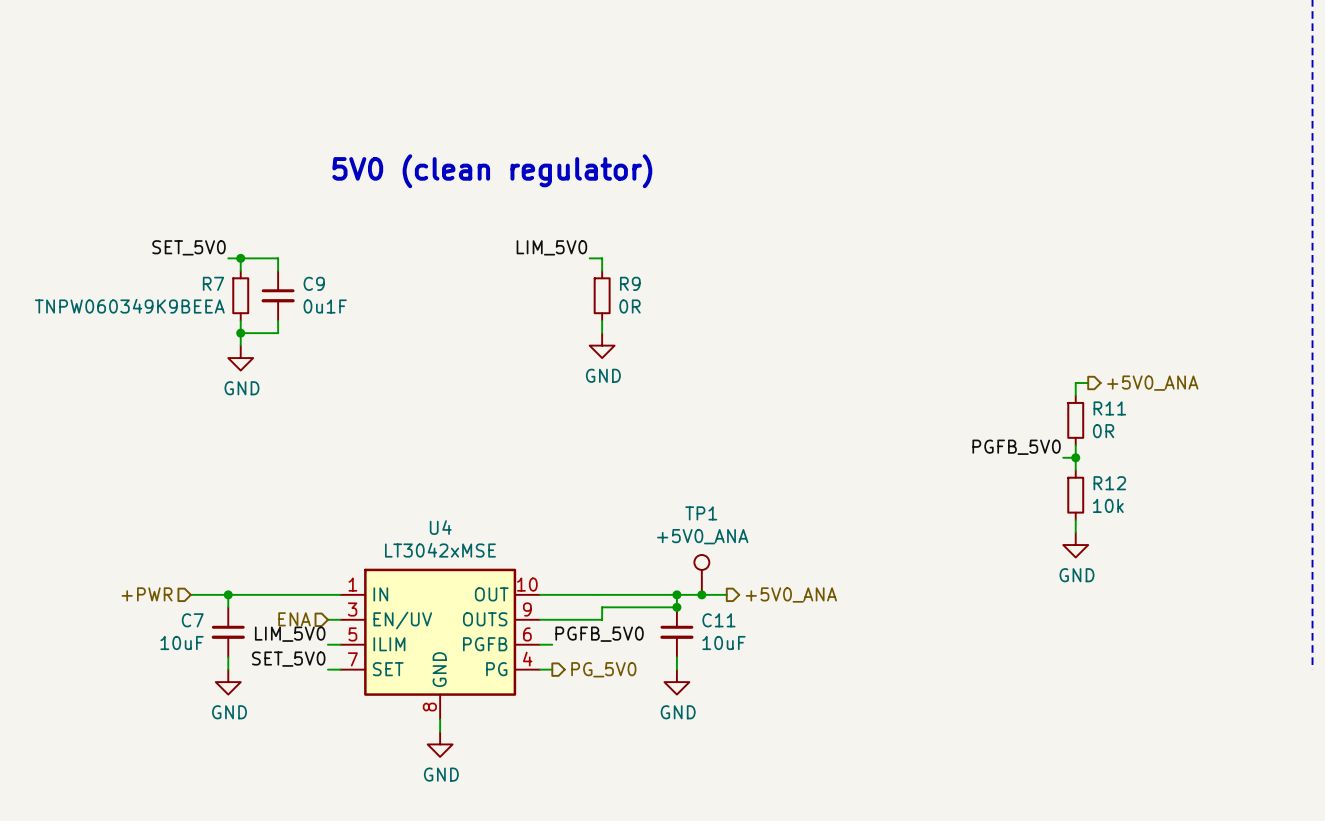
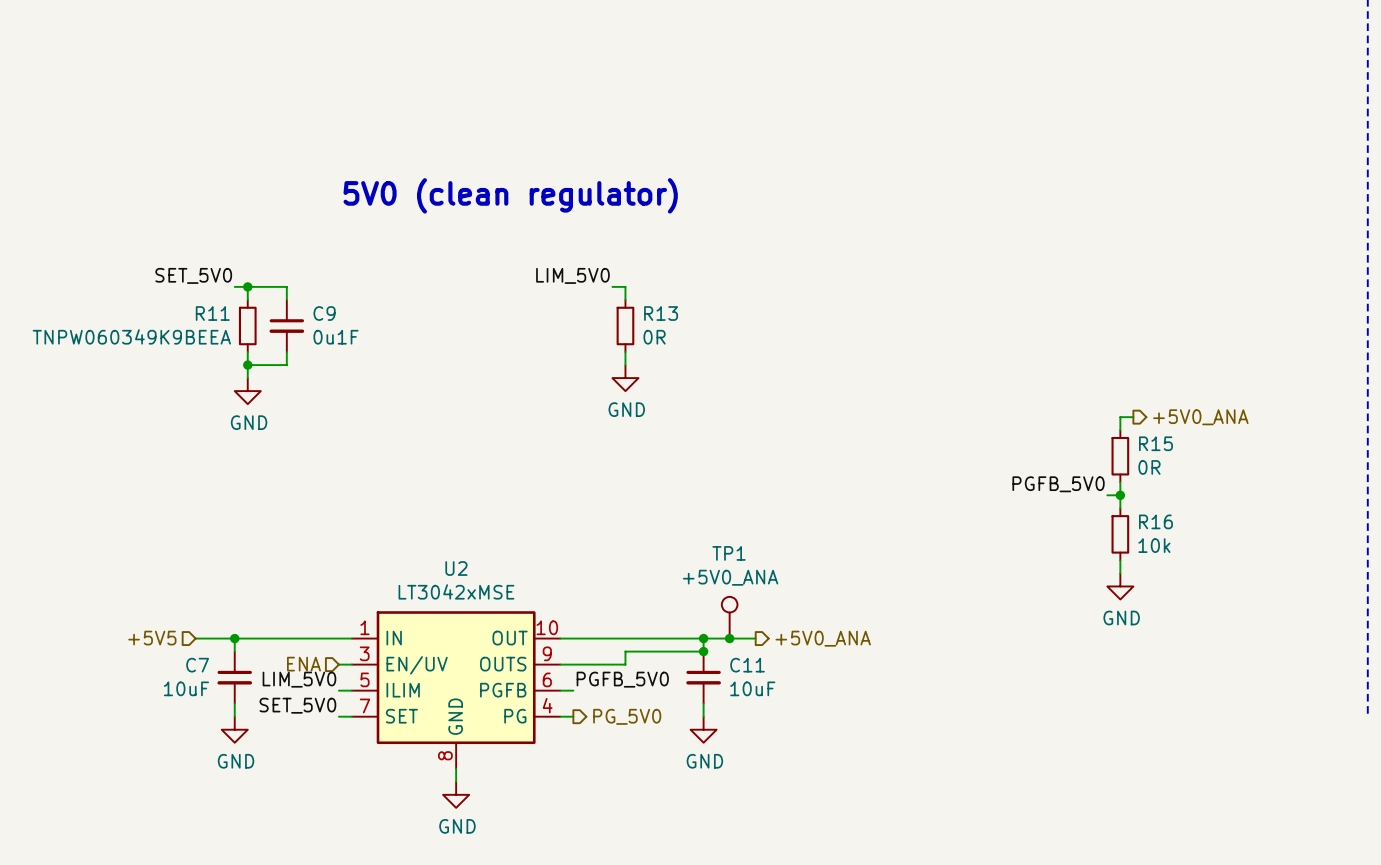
R7 name: R7 (213, 283) -> R11 (212, 313)
R9 name: R9 (630, 283) -> R13 (661, 313)
R11 name: R11 (1109, 408) -> R15 (1155, 443)
R12 name: R12 (1109, 483) -> R16 (1155, 521)
U4 name: U4 (440, 527) -> U2 (456, 568)
hierarchical label: +PWR (147, 594) -> +5V5 (152, 638)

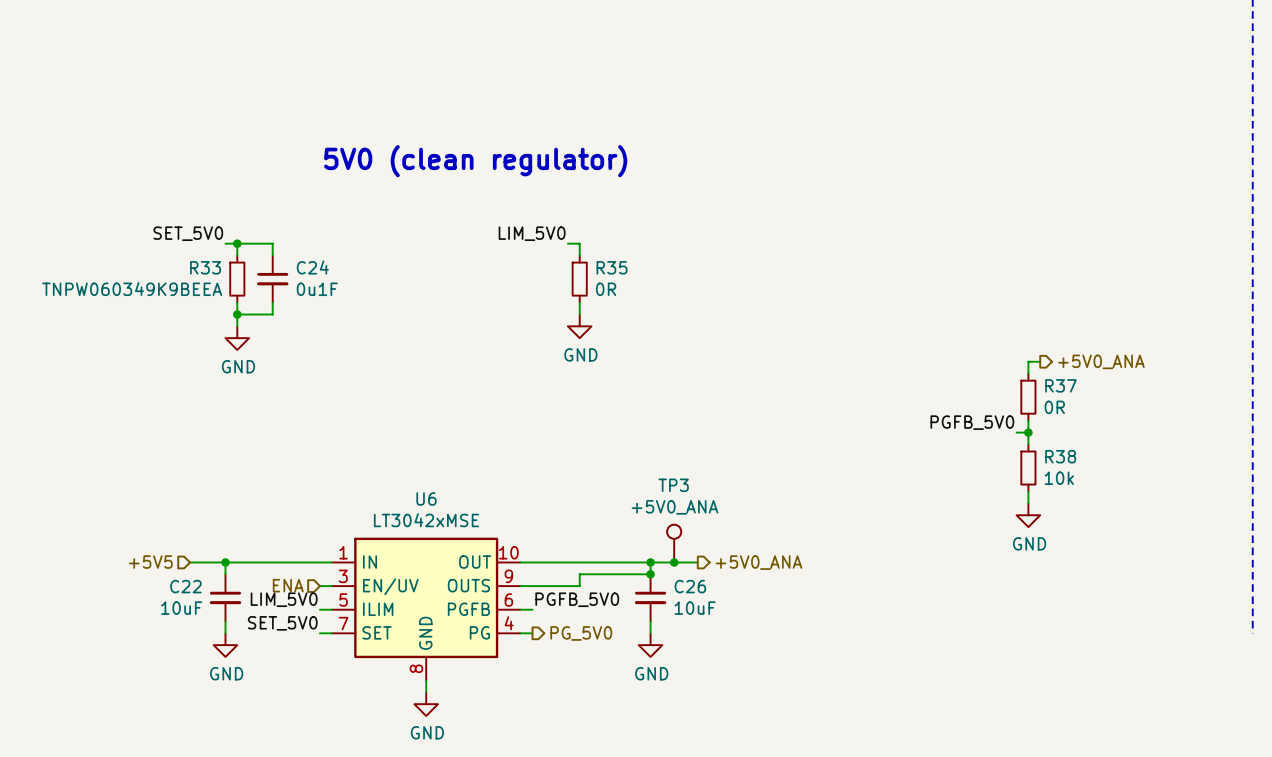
R11 name: R11 (212, 313) -> R33 (205, 267)
C9 name: C9 (324, 313) -> C24 (312, 267)
R13 name: R13 (661, 313) -> R35 (612, 267)
R15 name: R15 (1155, 443) -> R37 (1060, 385)
R16 name: R16 (1155, 521) -> R38 (1060, 456)
TP1 name: TP1 (729, 553) -> TP3 (673, 485)
U2 name: U2 (456, 568) -> U6 (426, 498)
C7 name: C7 (197, 665) -> C22 (185, 586)
C11 name: C11 (747, 665) -> C26 (690, 586)

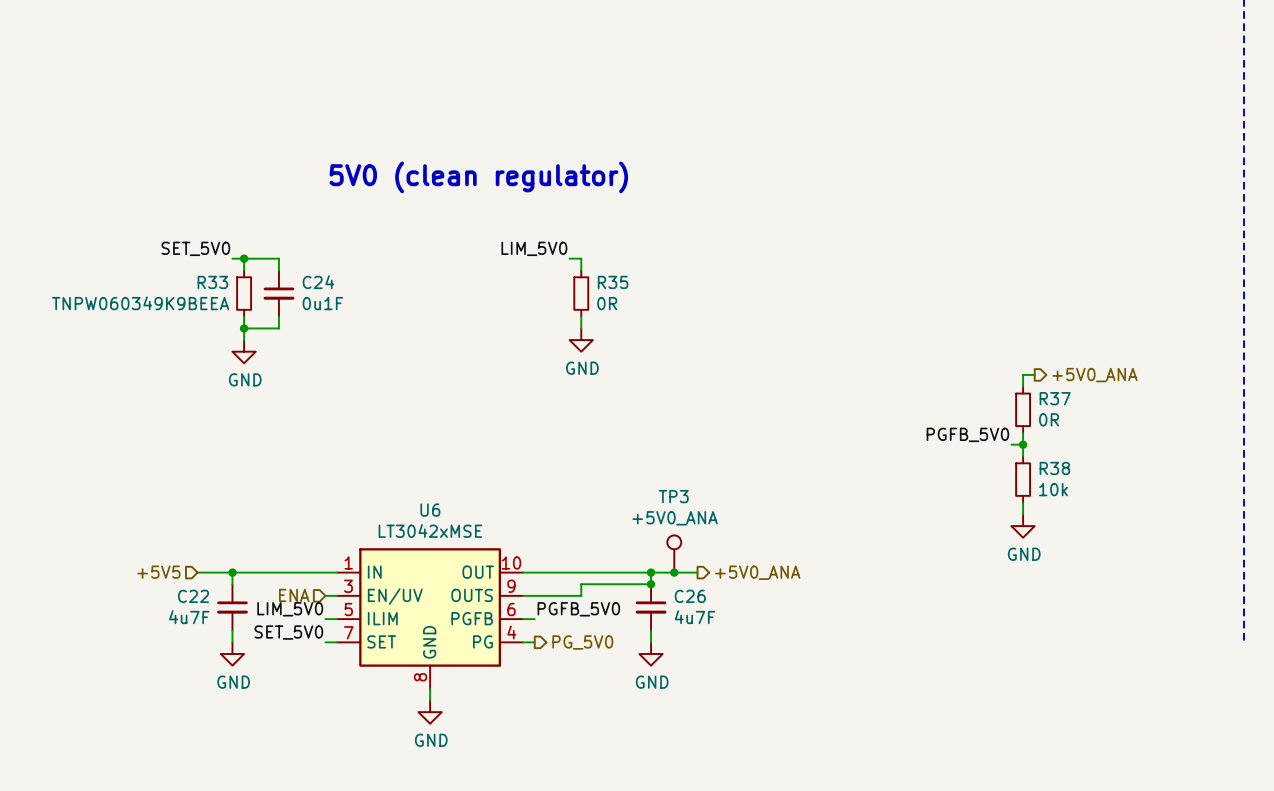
C22 value: 10uF (181, 608) -> 4u7F (189, 617)
C26 value: 10uF (695, 608) -> 4u7F (694, 617)

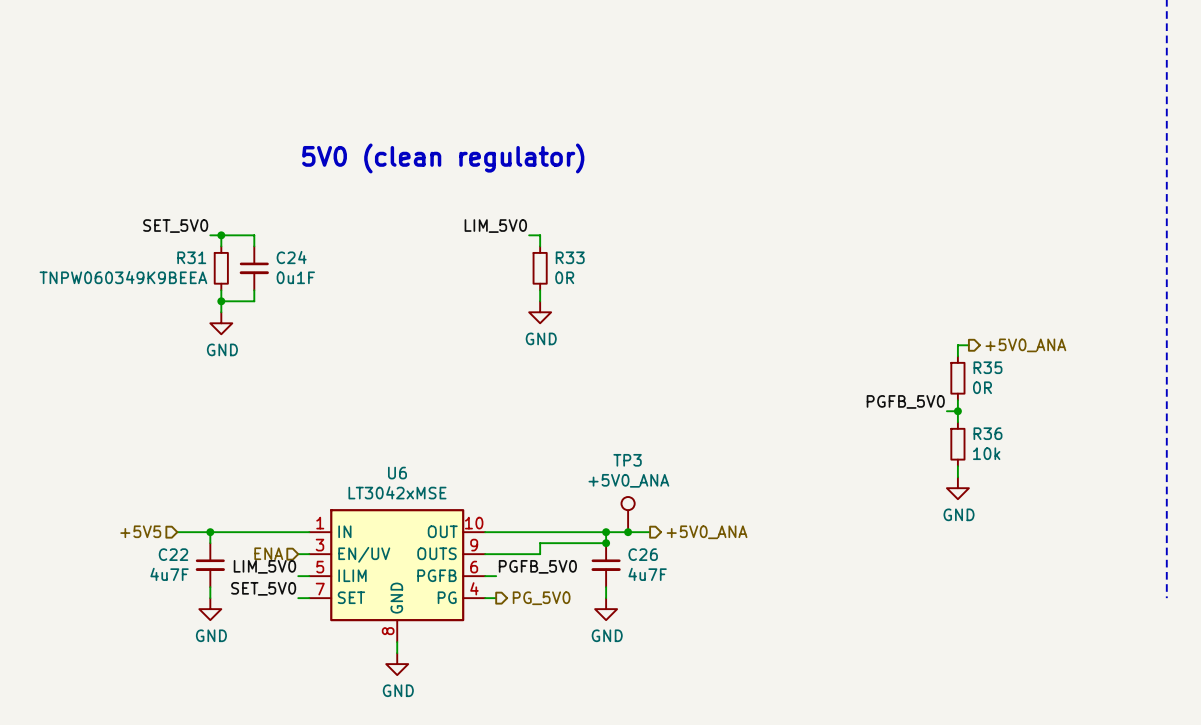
R33 name: R33 (212, 282) -> R31 (191, 257)
R35 name: R35 (613, 282) -> R33 (570, 257)
R37 name: R37 (1055, 398) -> R35 (987, 367)
R38 name: R38 (1054, 468) -> R36 (987, 433)

